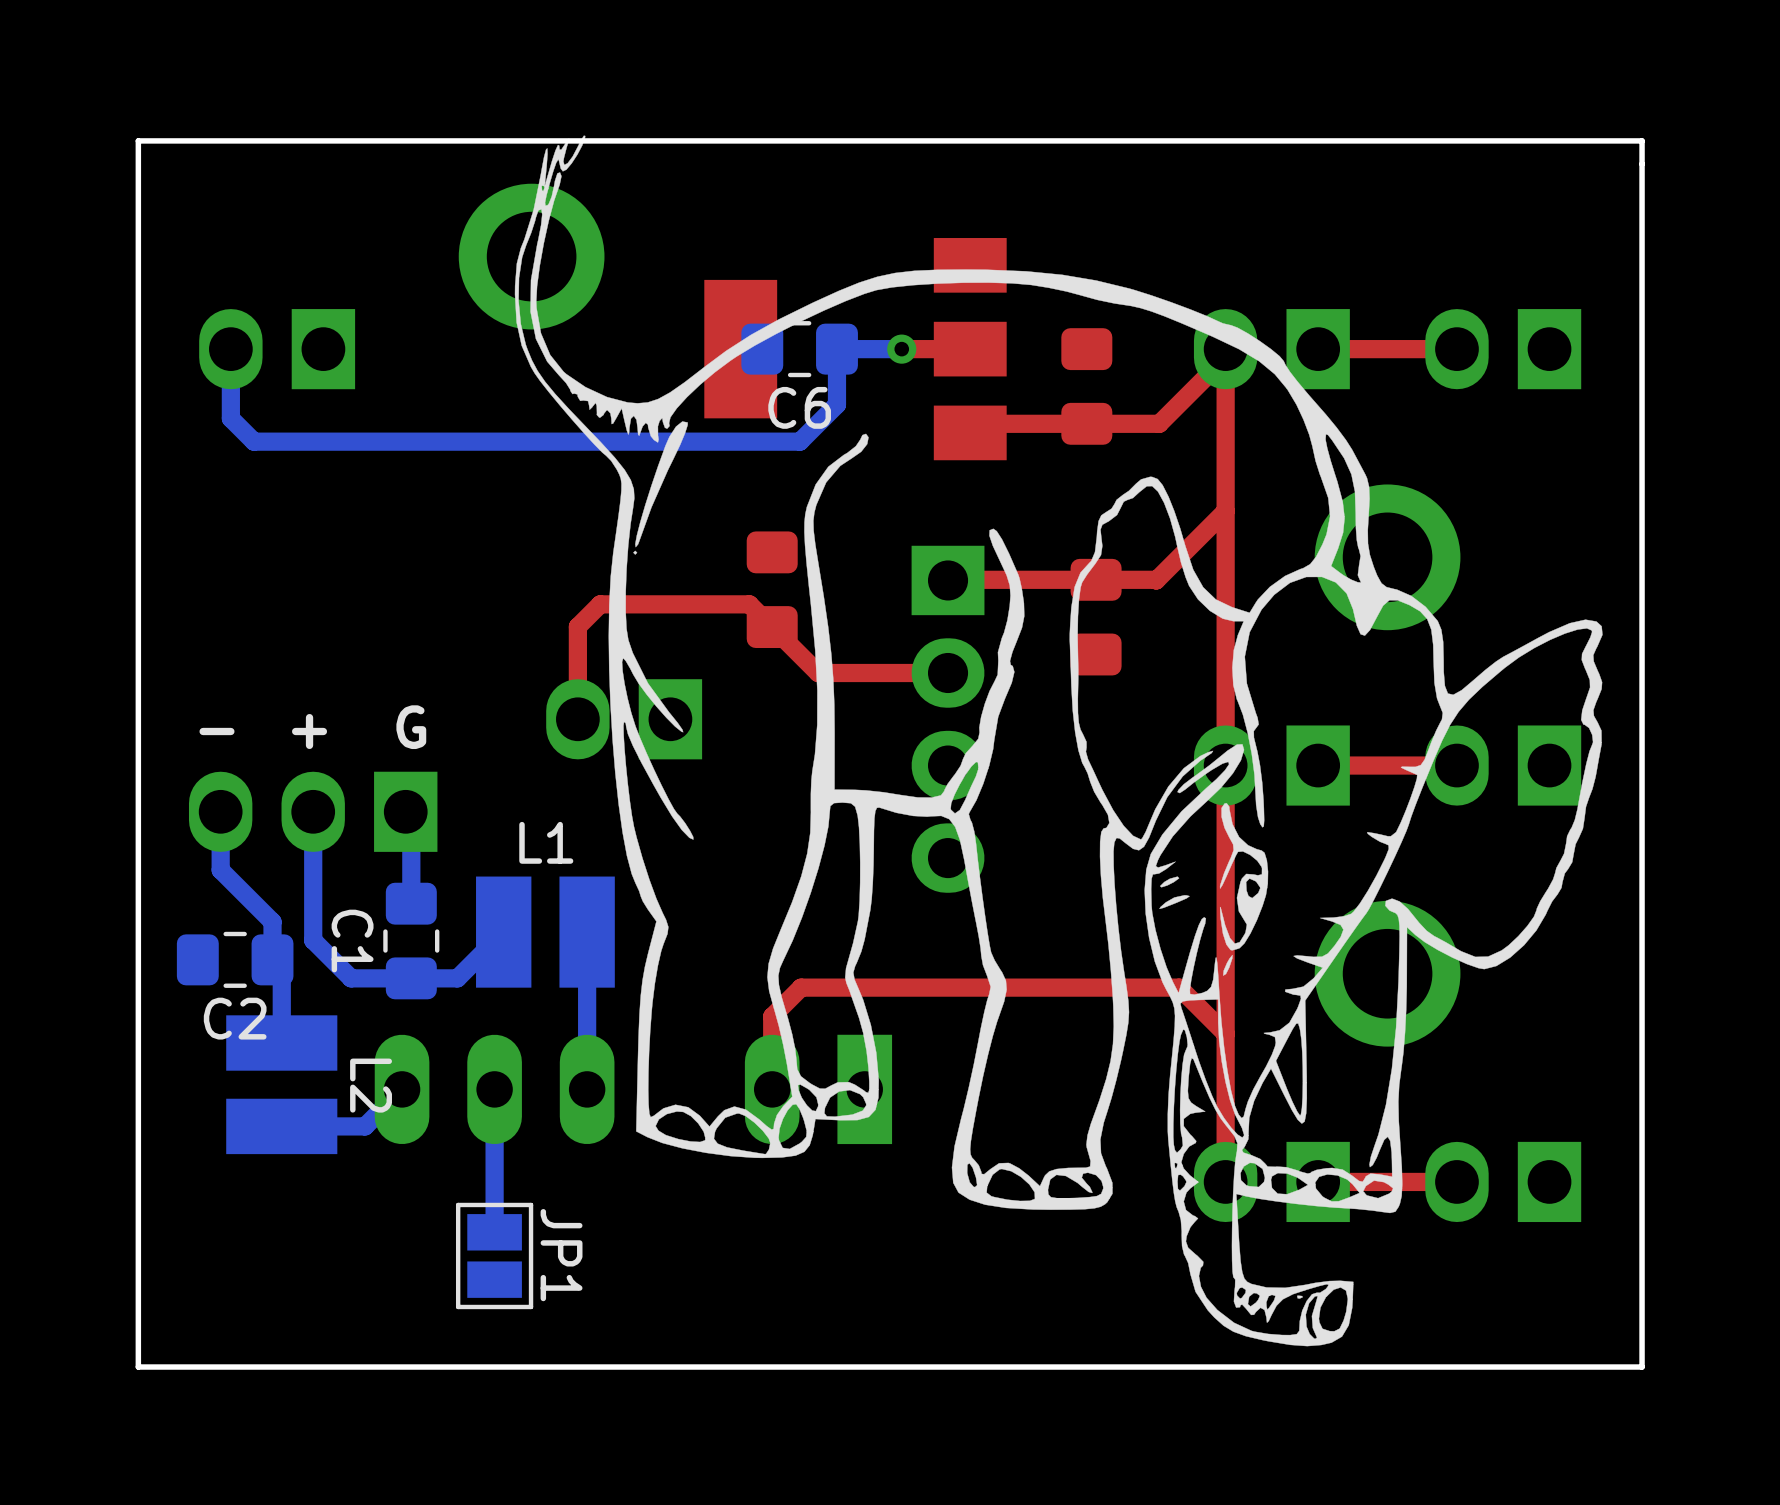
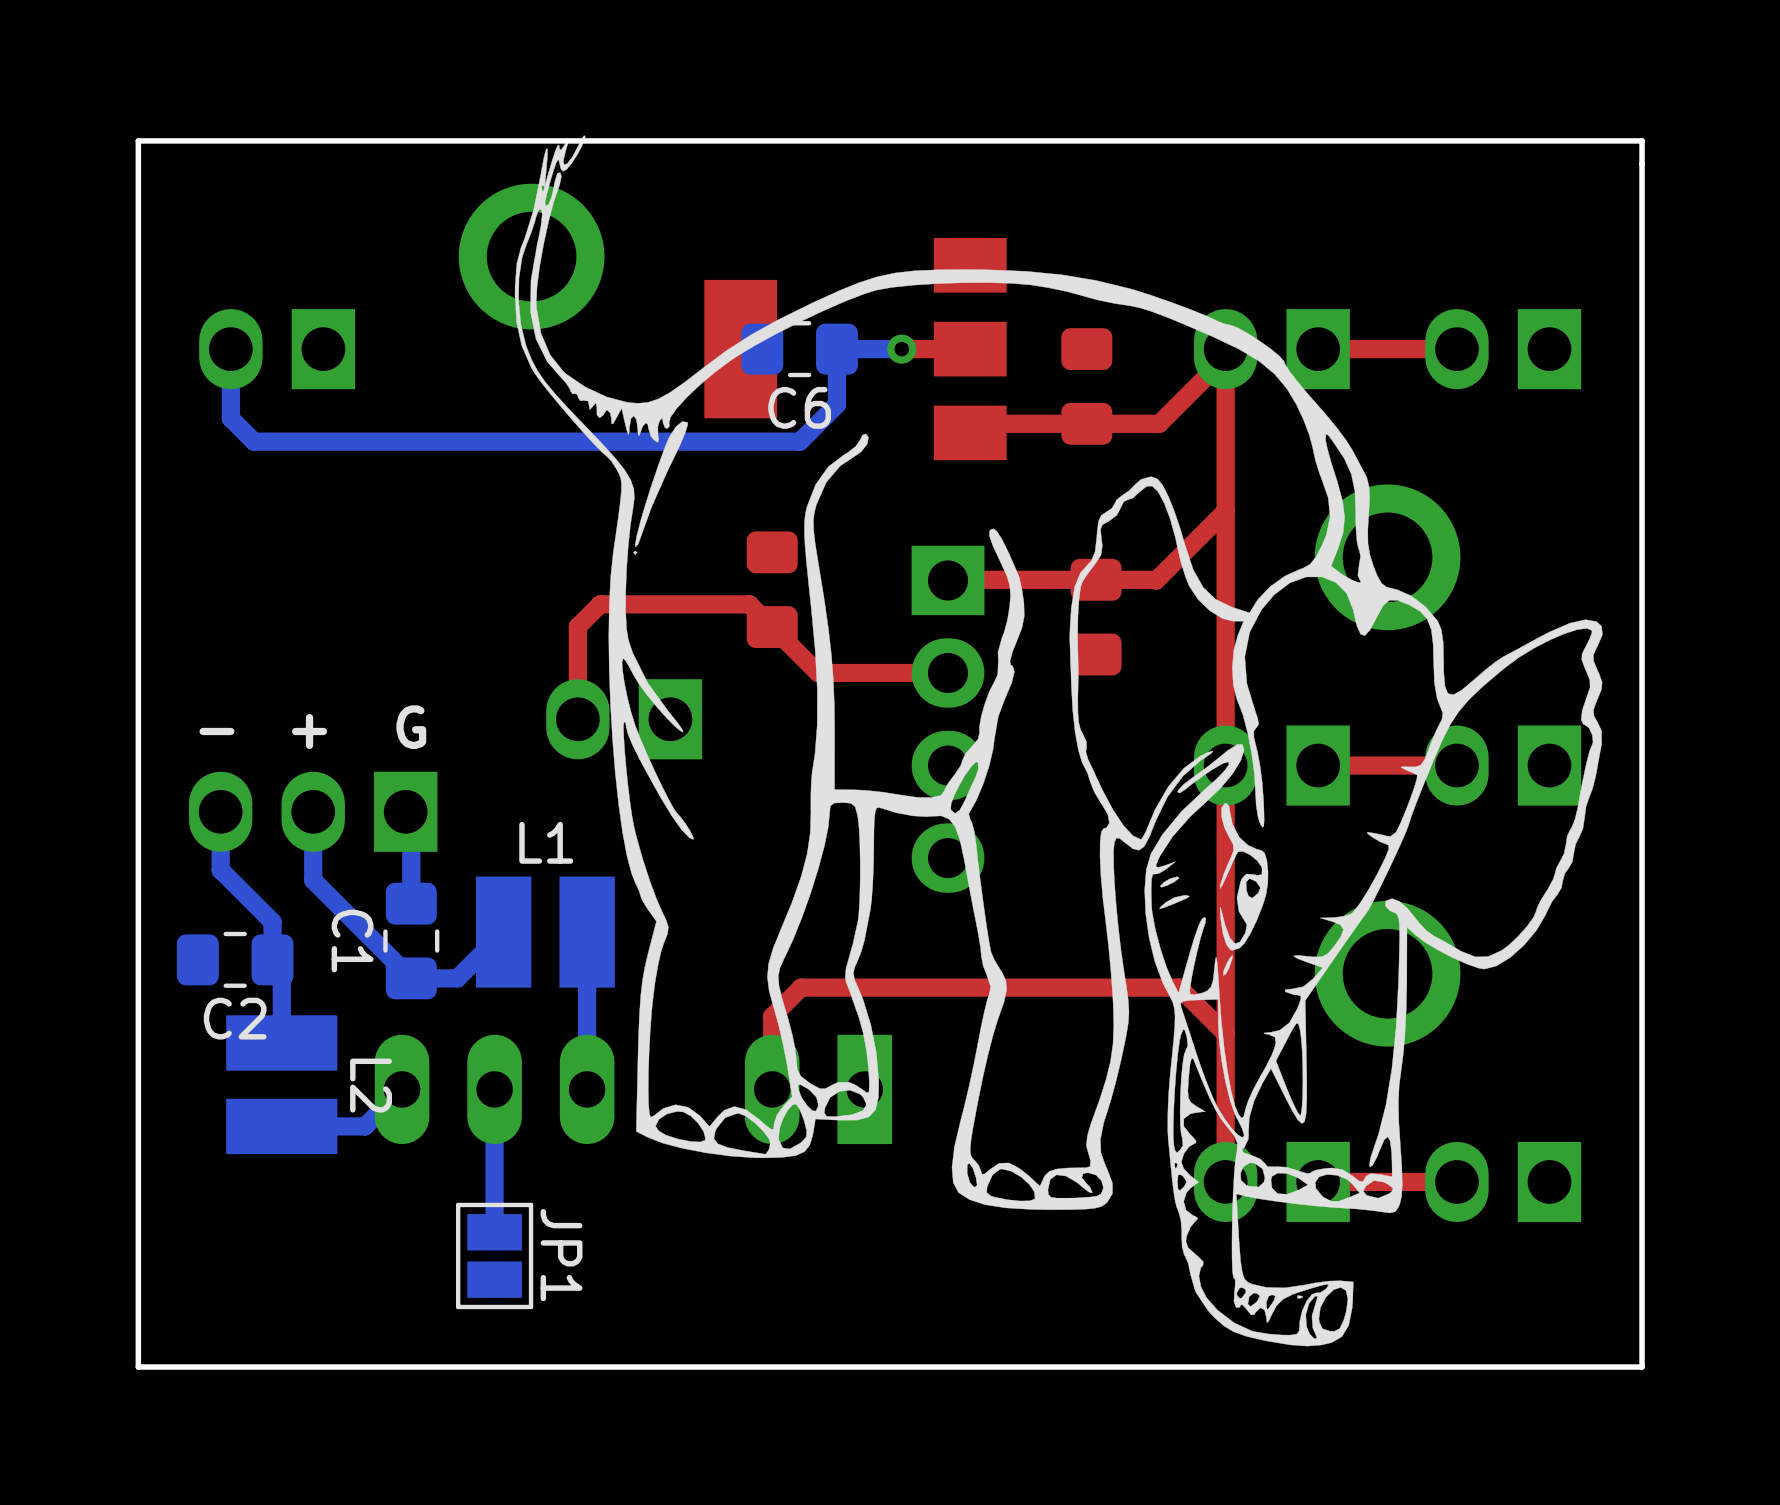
bottom track: (313, 880) (313, 940) (351, 978) (411, 978) -> (313, 880) (411, 978)

